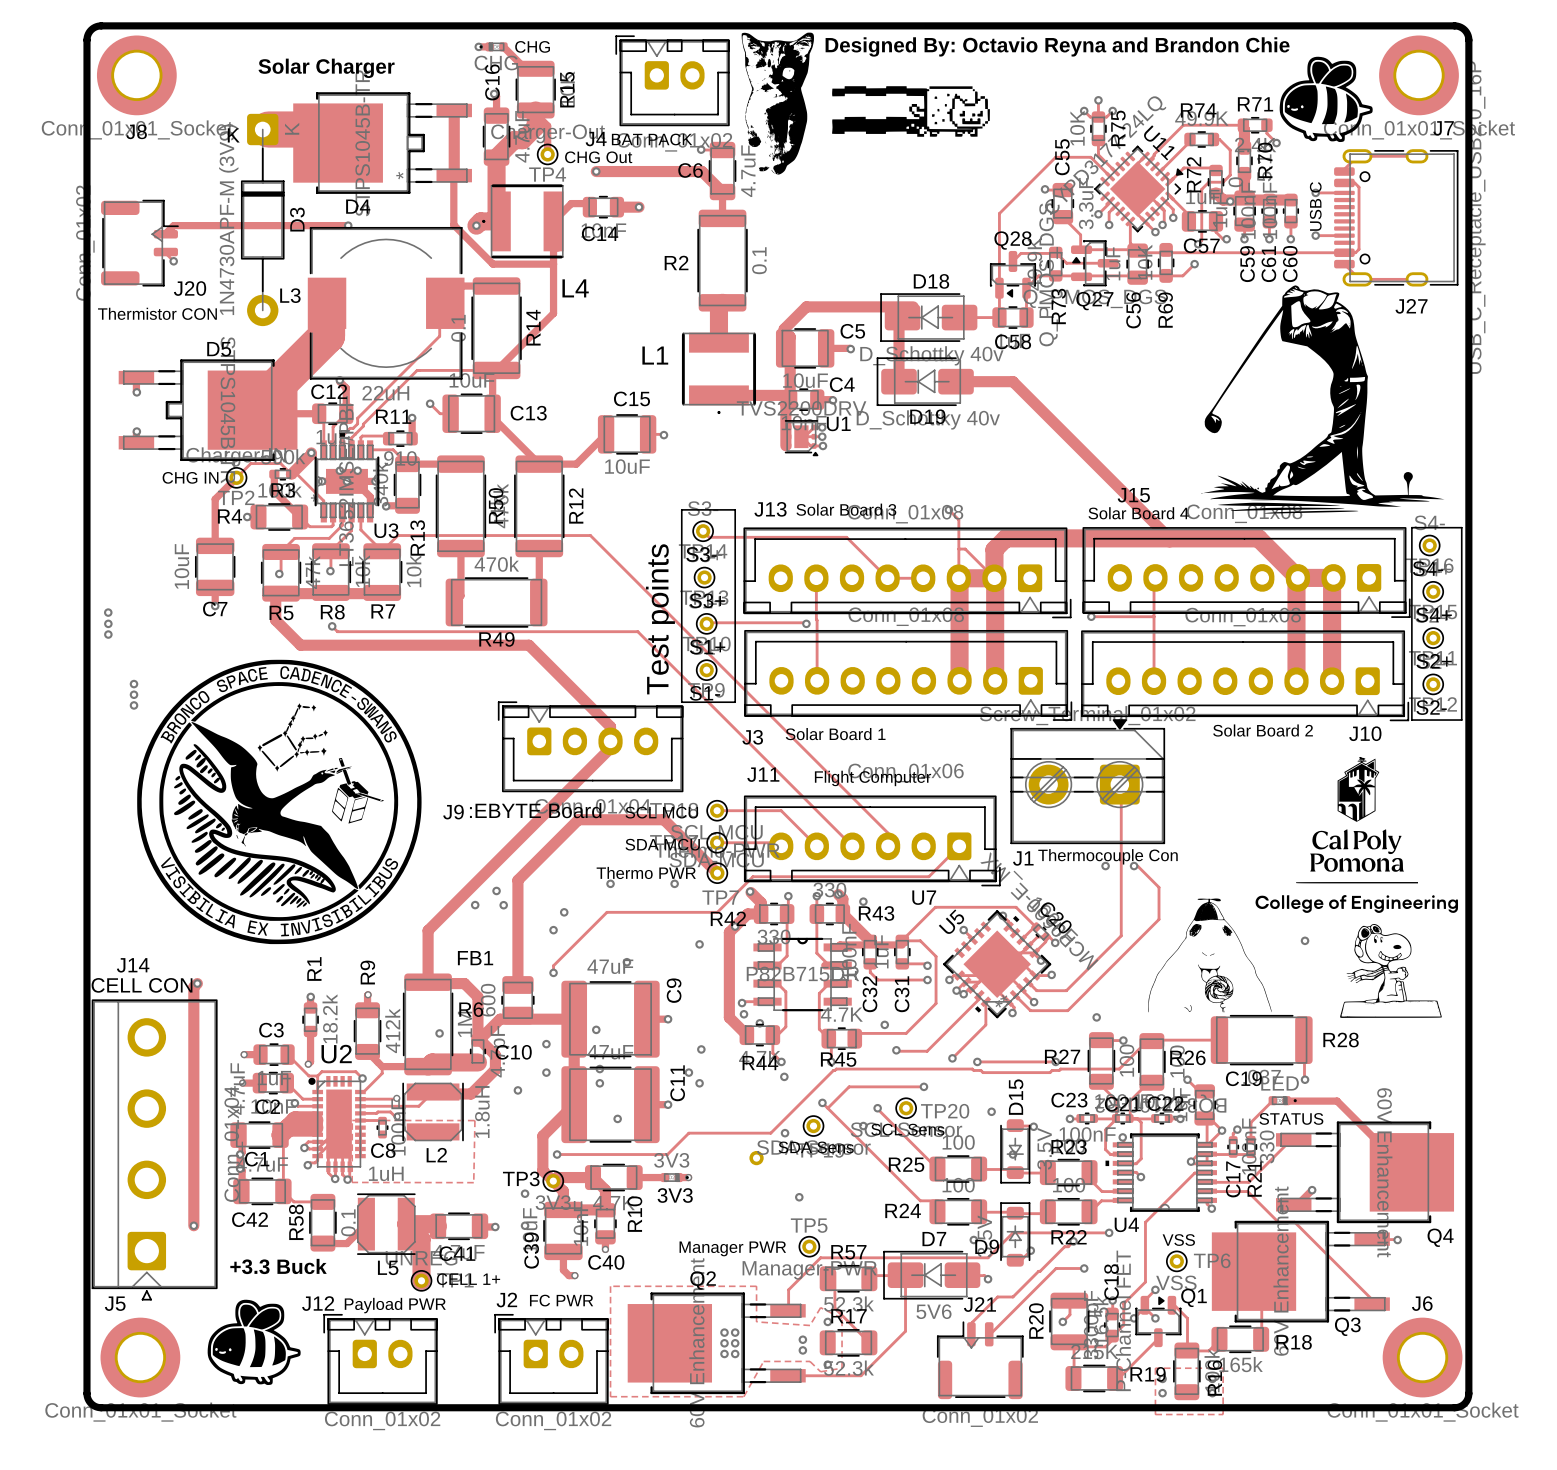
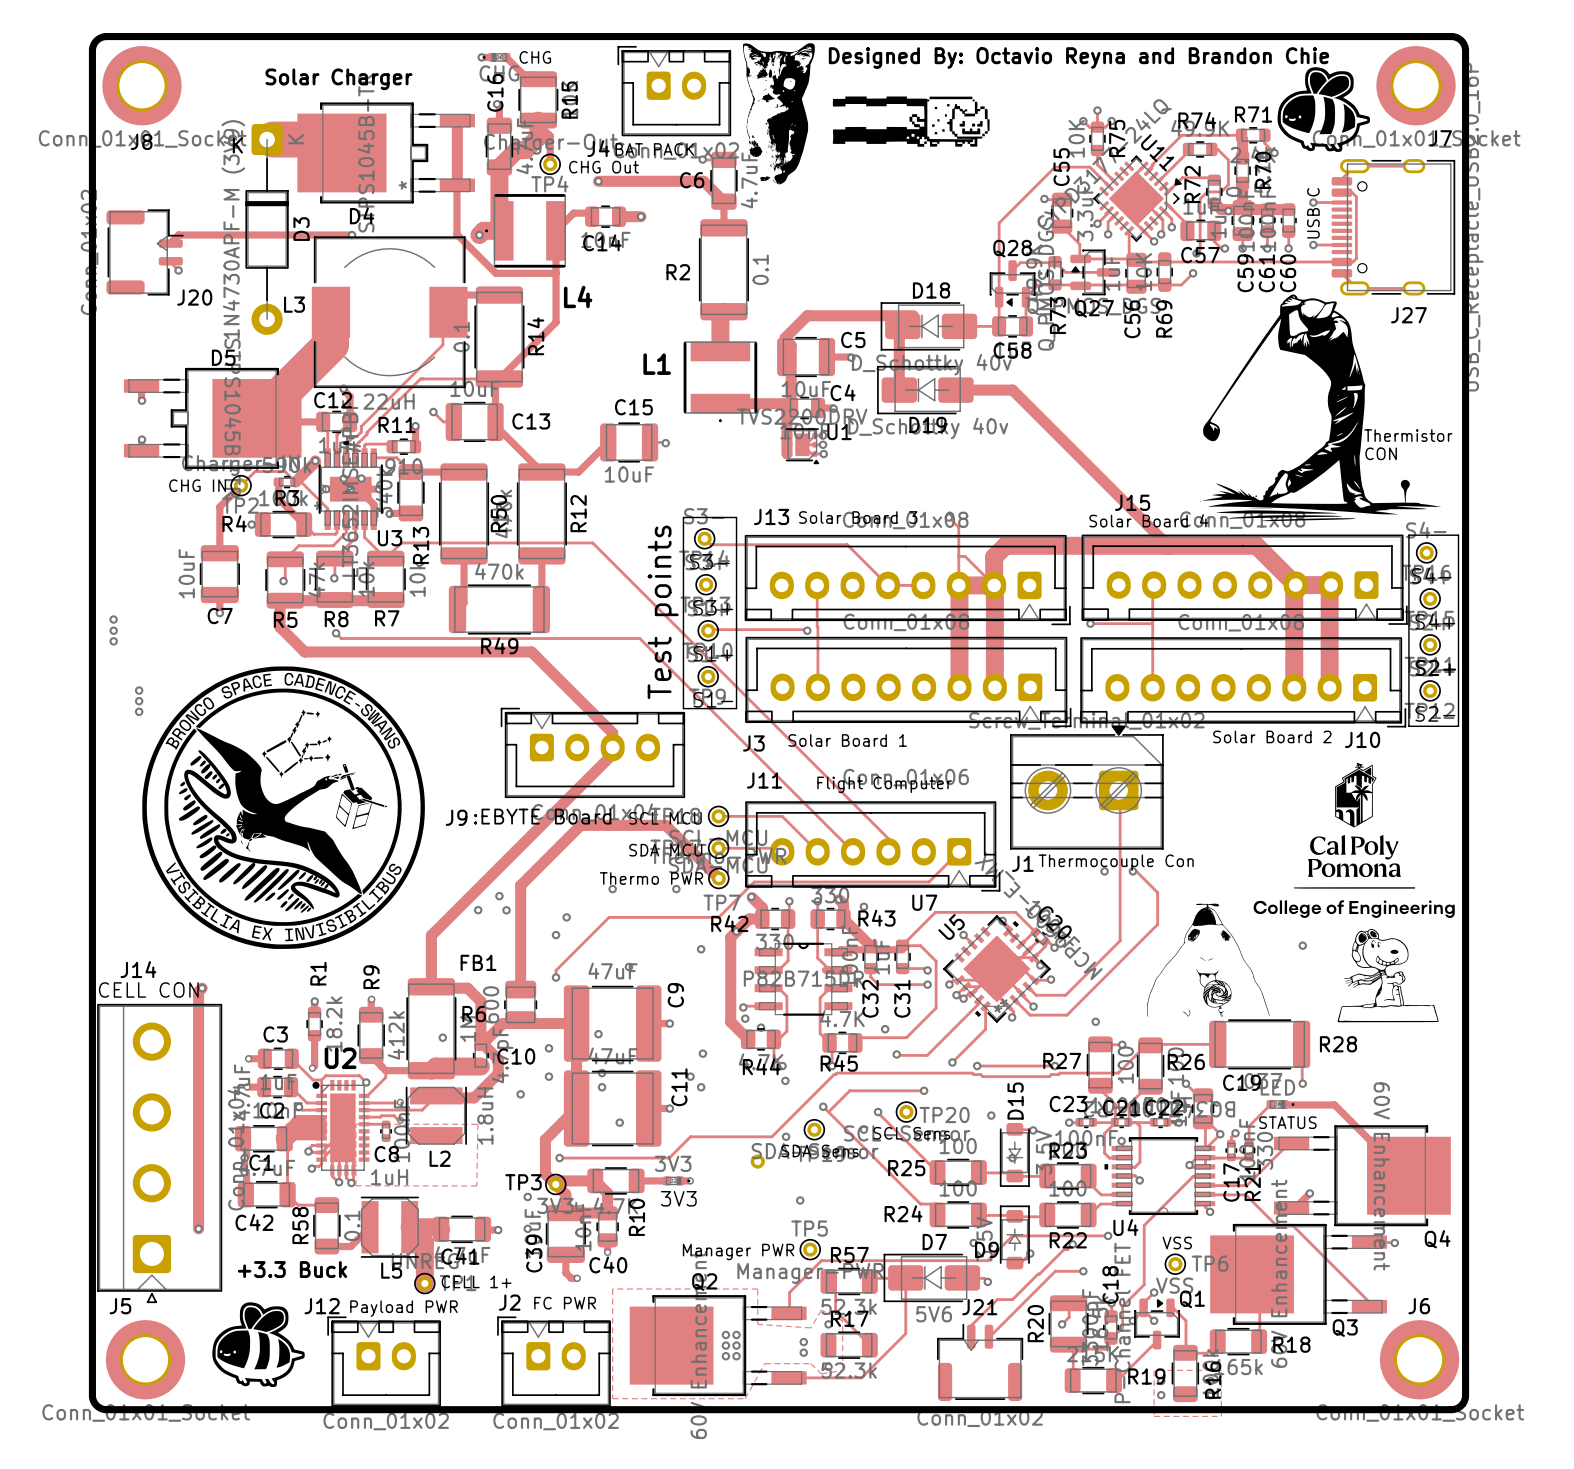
text: Thermistor CON (157, 313) -> none
text: none -> Thermistor (1408, 435)
text: none -> CON (1381, 453)

